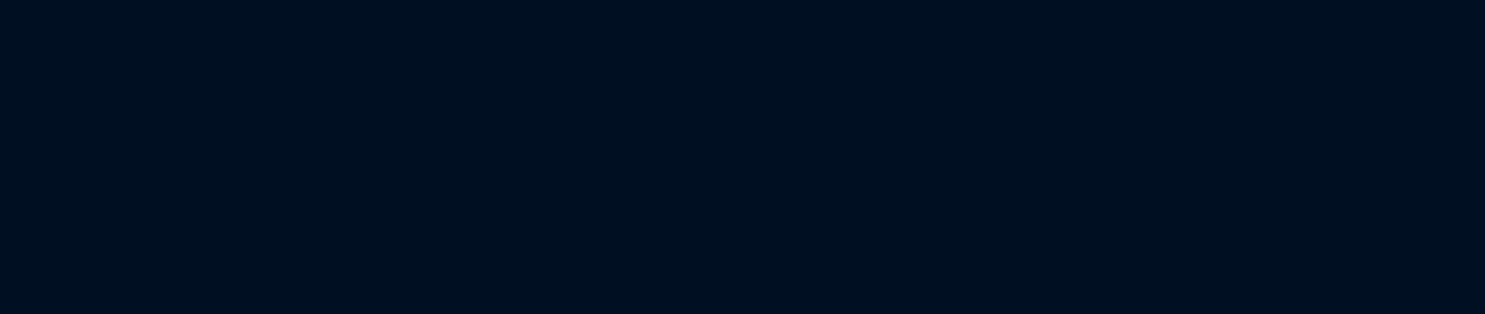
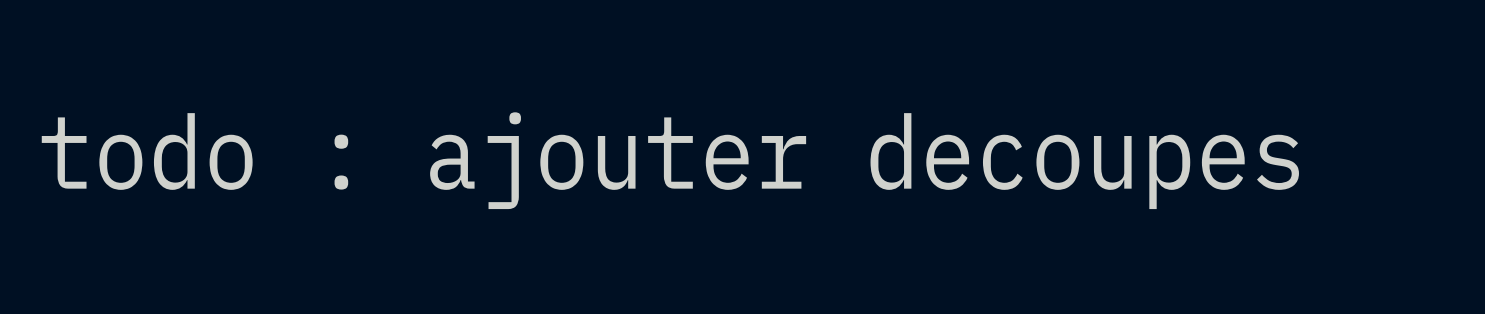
text: none -> todo : ajouter decoupes (670, 160)

